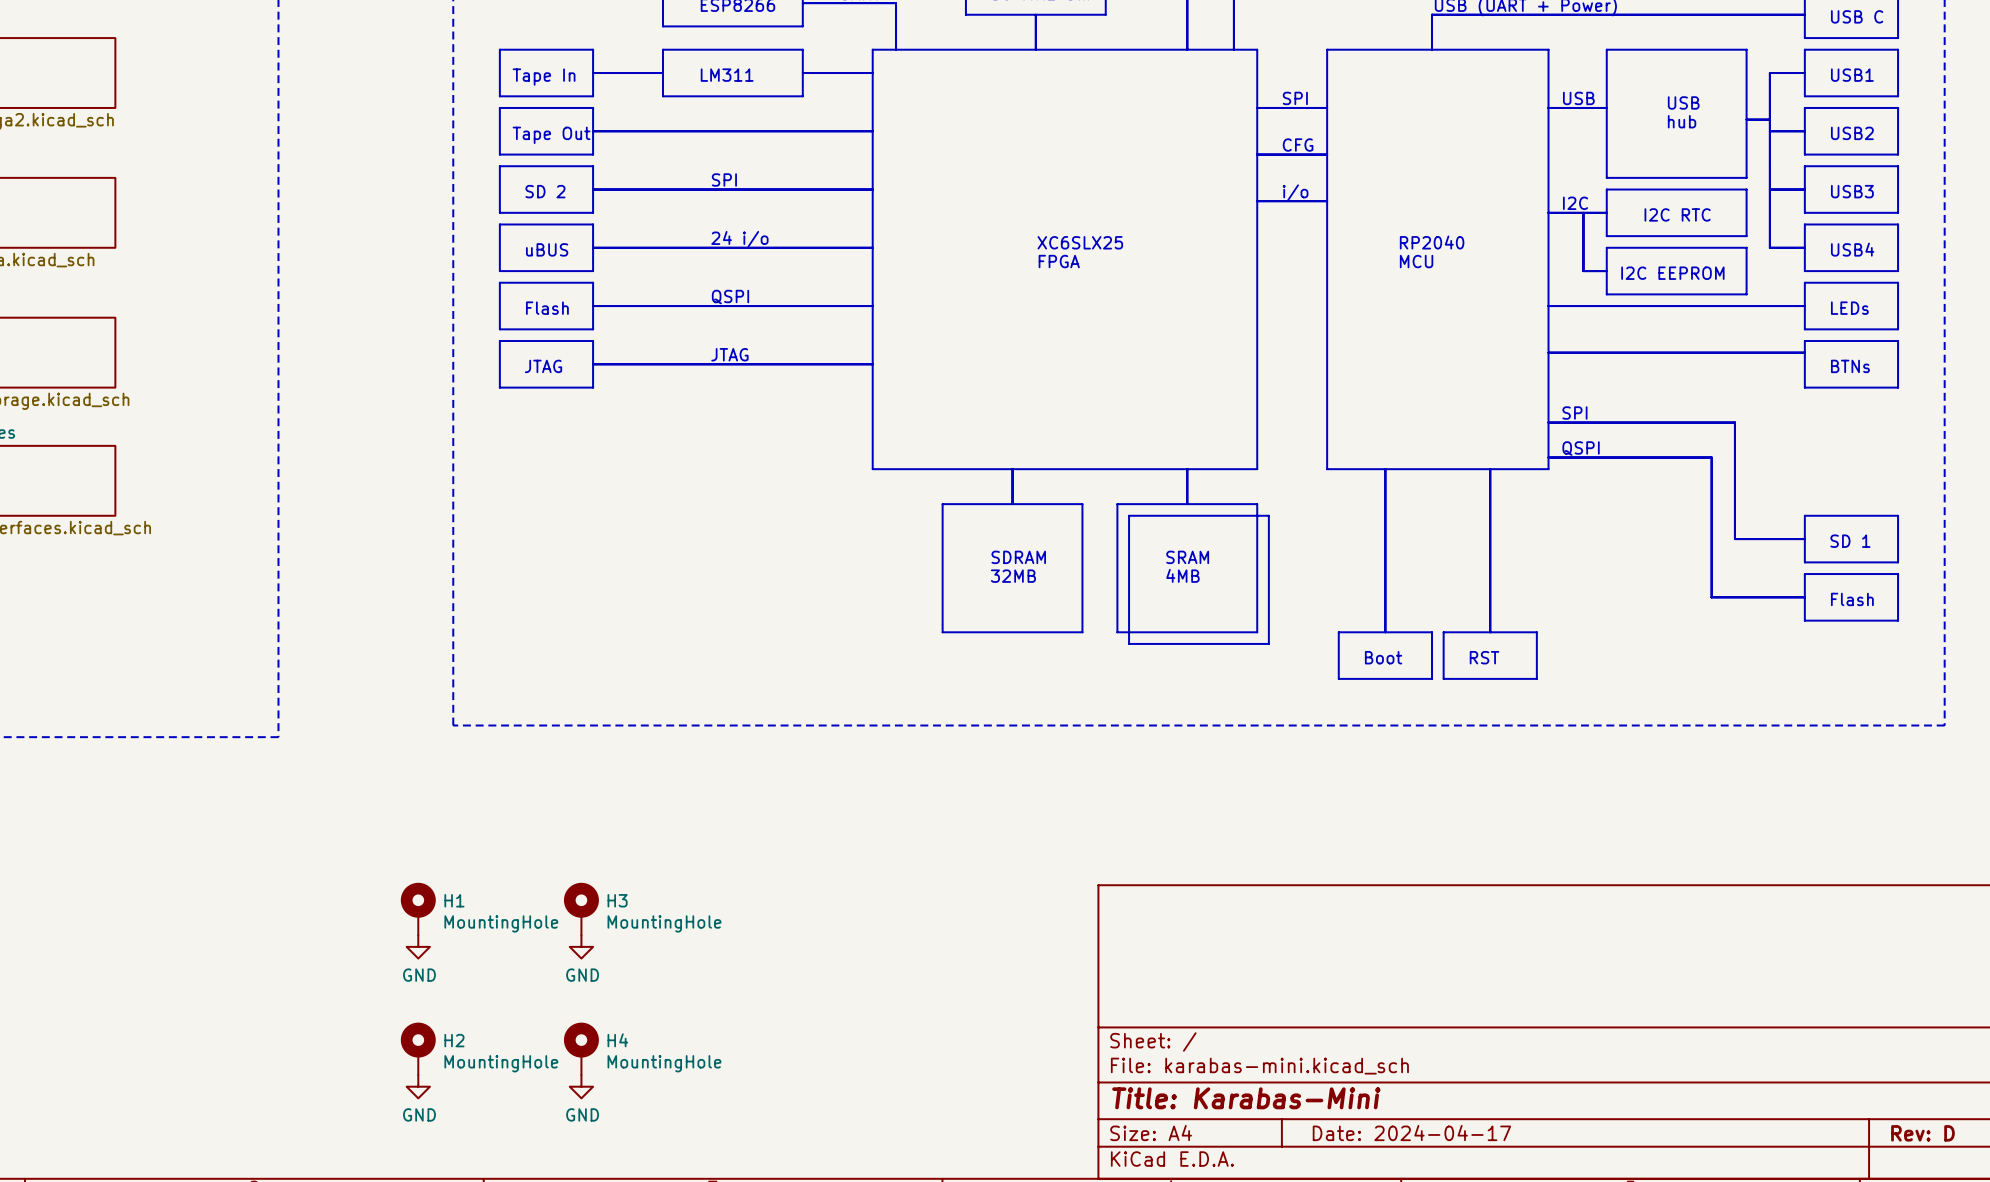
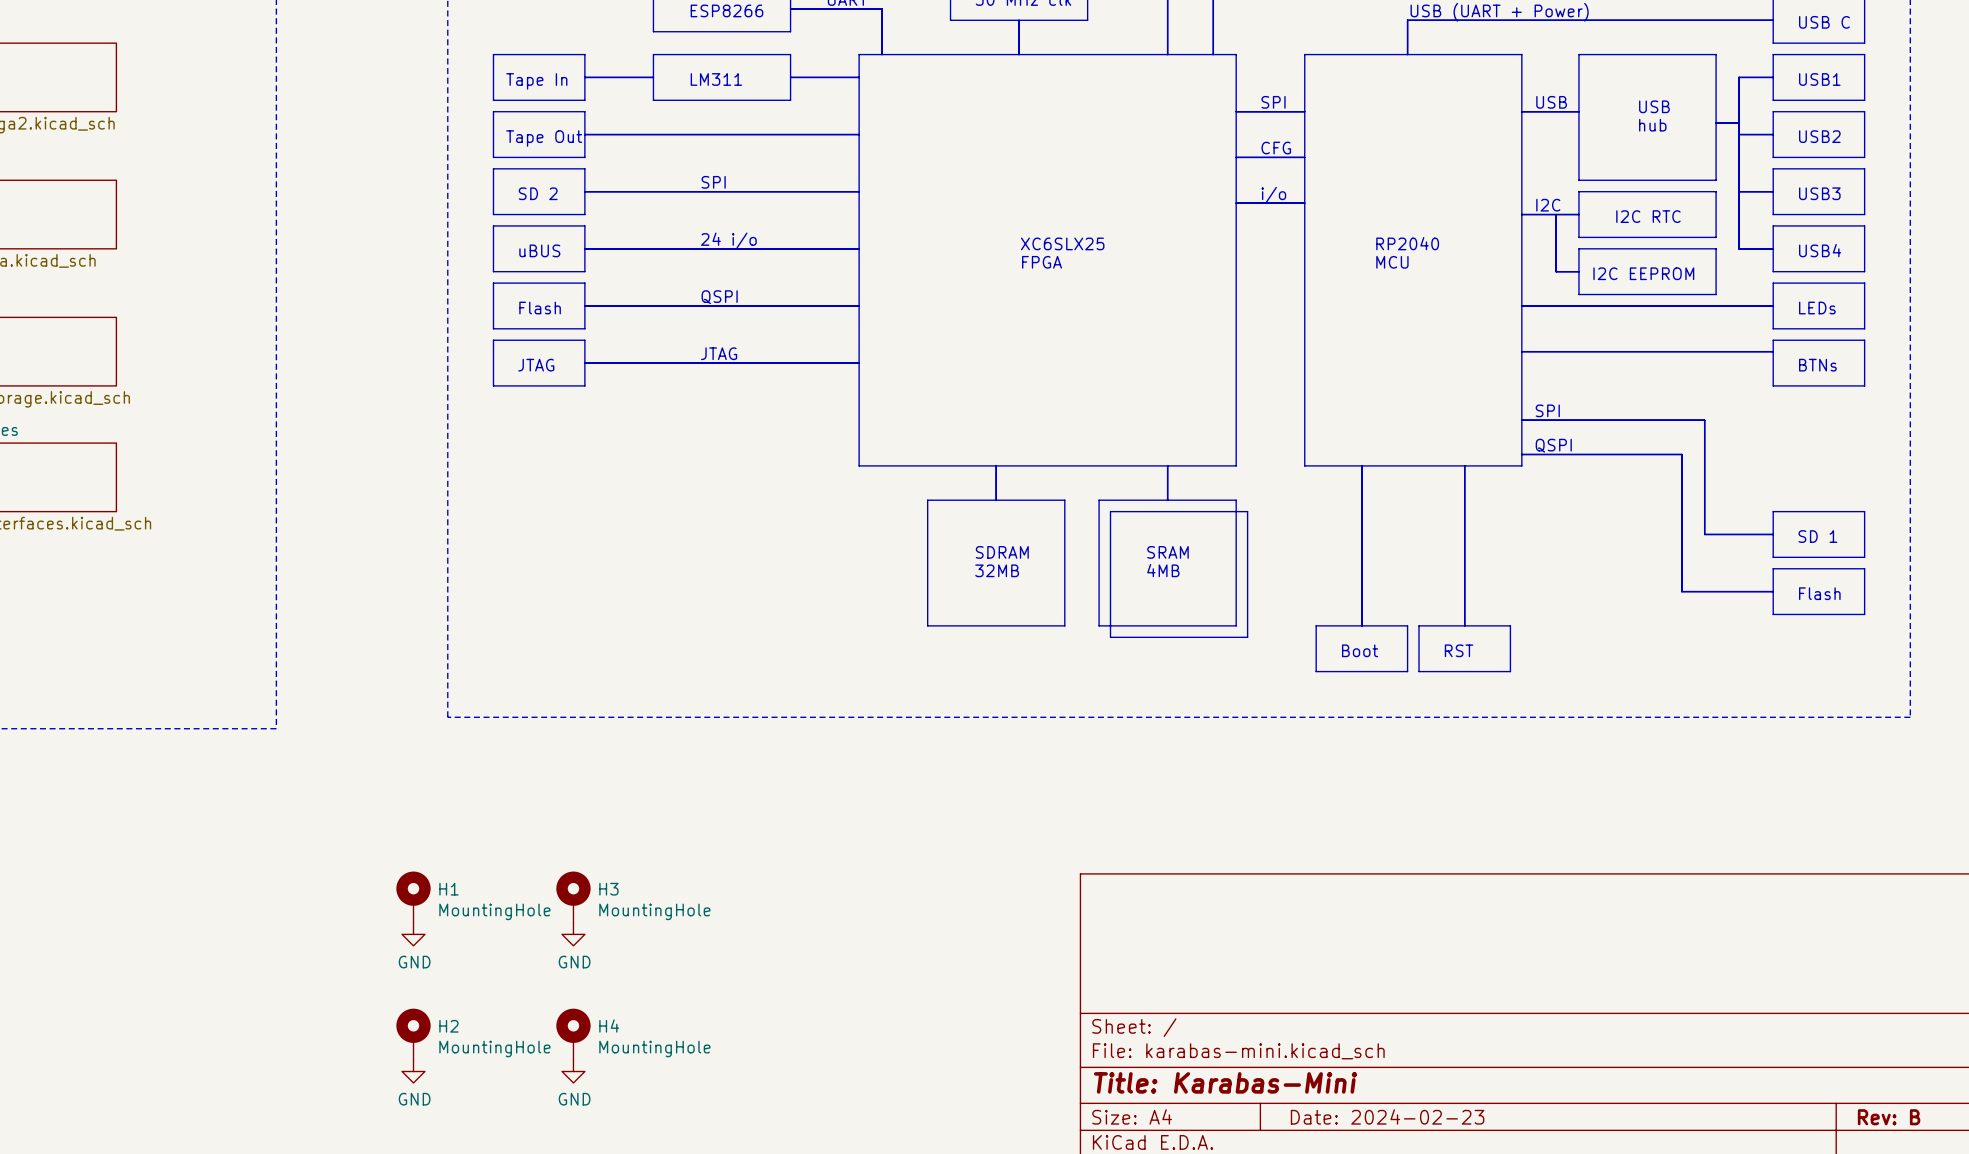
title block: Date: 2024-04-17 (1411, 1133) -> Date: 2024-02-23 (1387, 1116)
title block: Rev: D (1922, 1133) -> Rev: B (1889, 1117)

